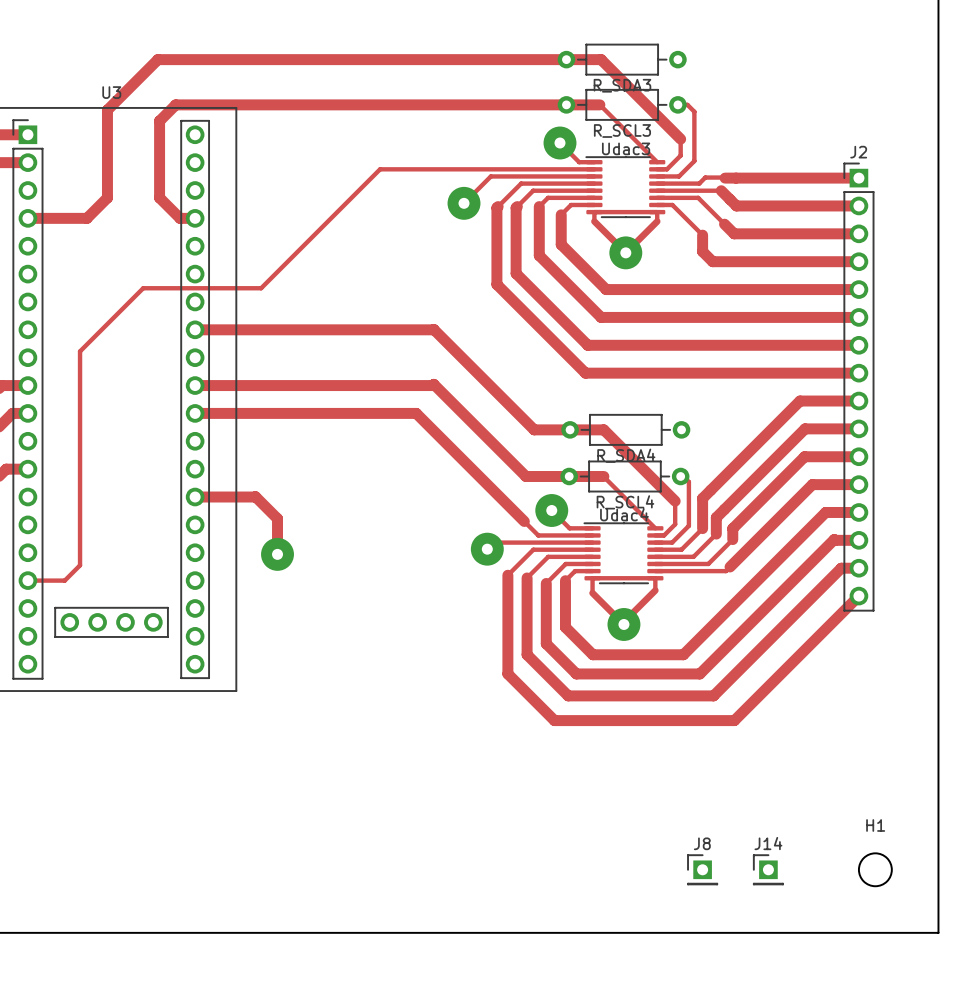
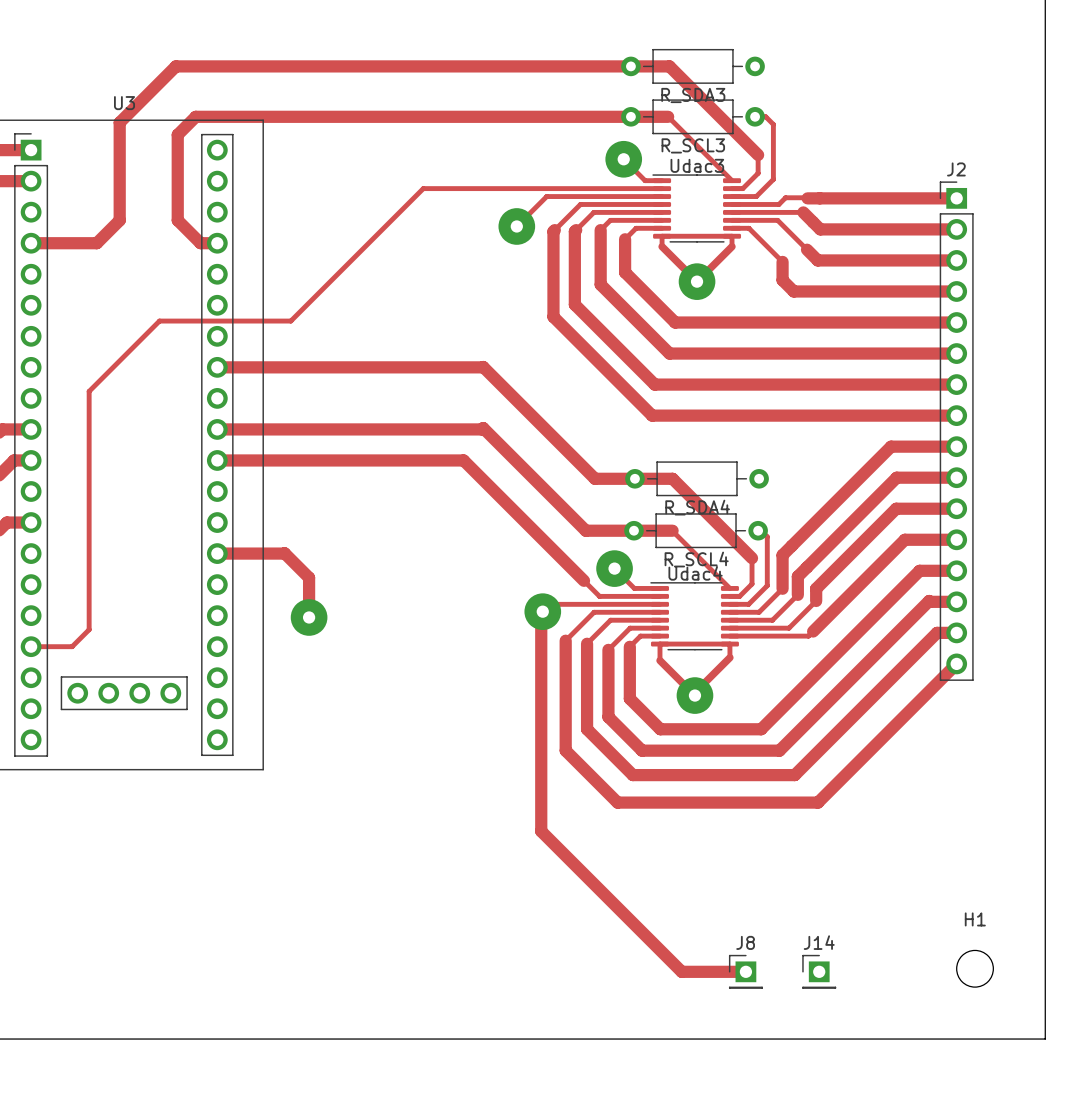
track: none -> (542, 611) (541, 613) (541, 831) (681, 971) (745, 971)
J8 position: (702, 869) -> (745, 971)
J14 position: (768, 869) -> (819, 971)

